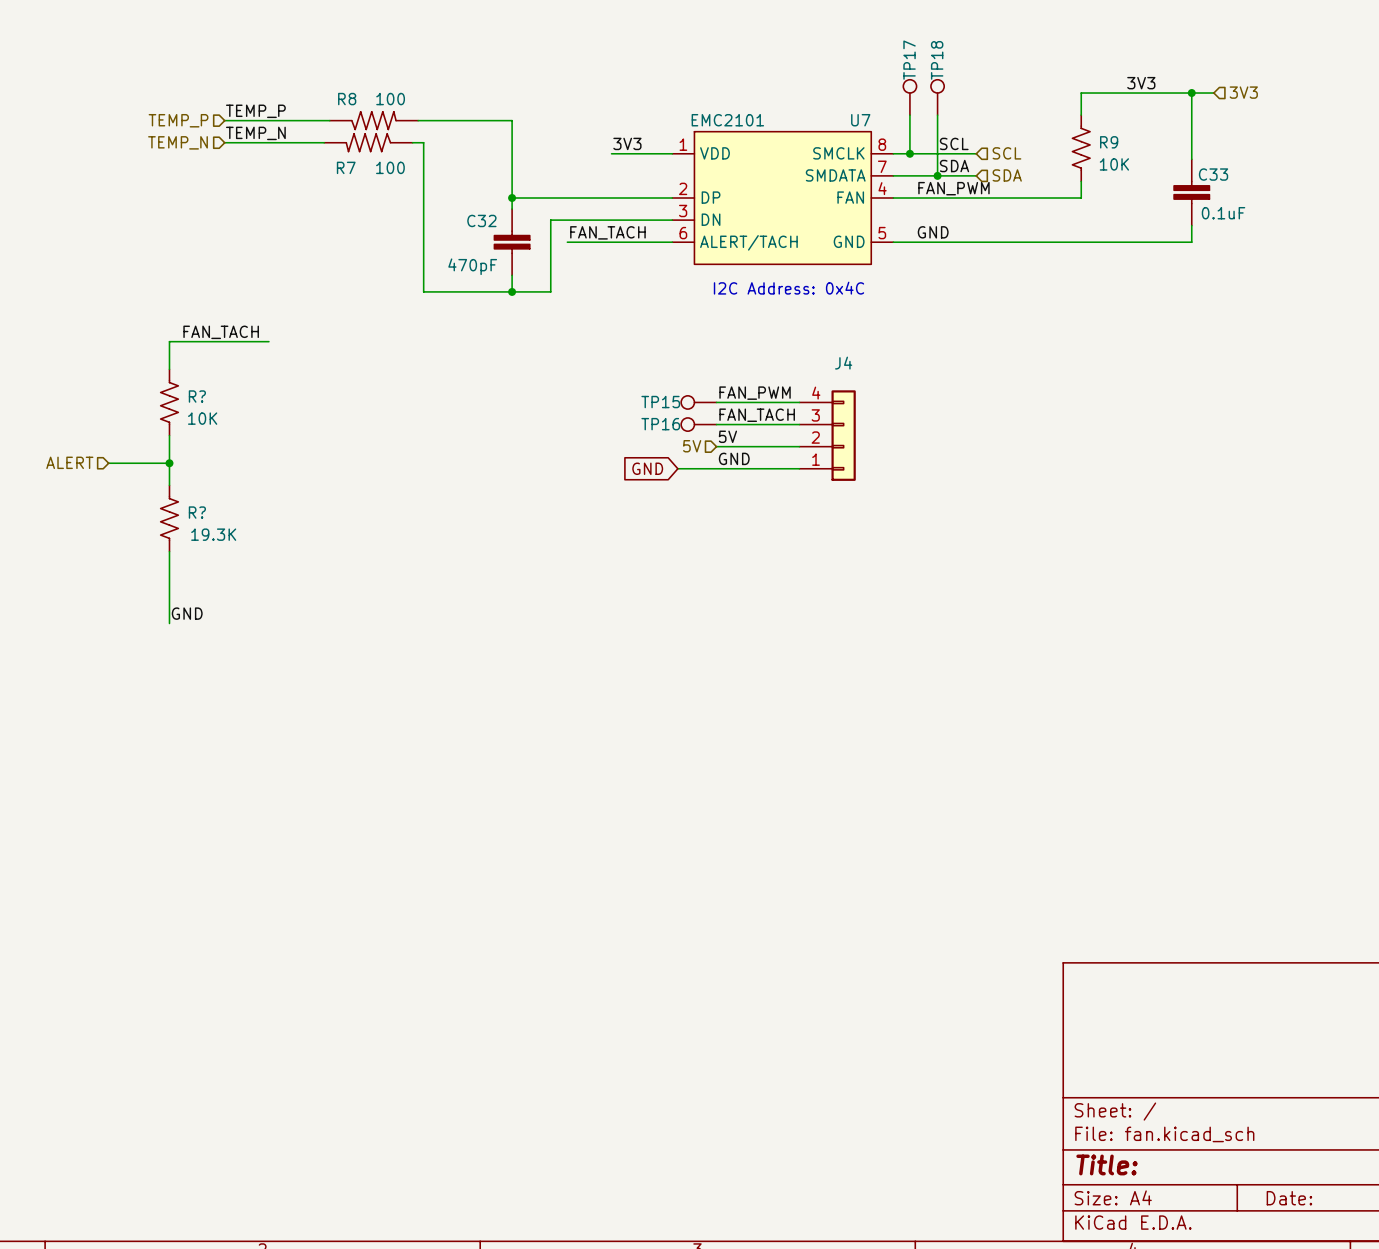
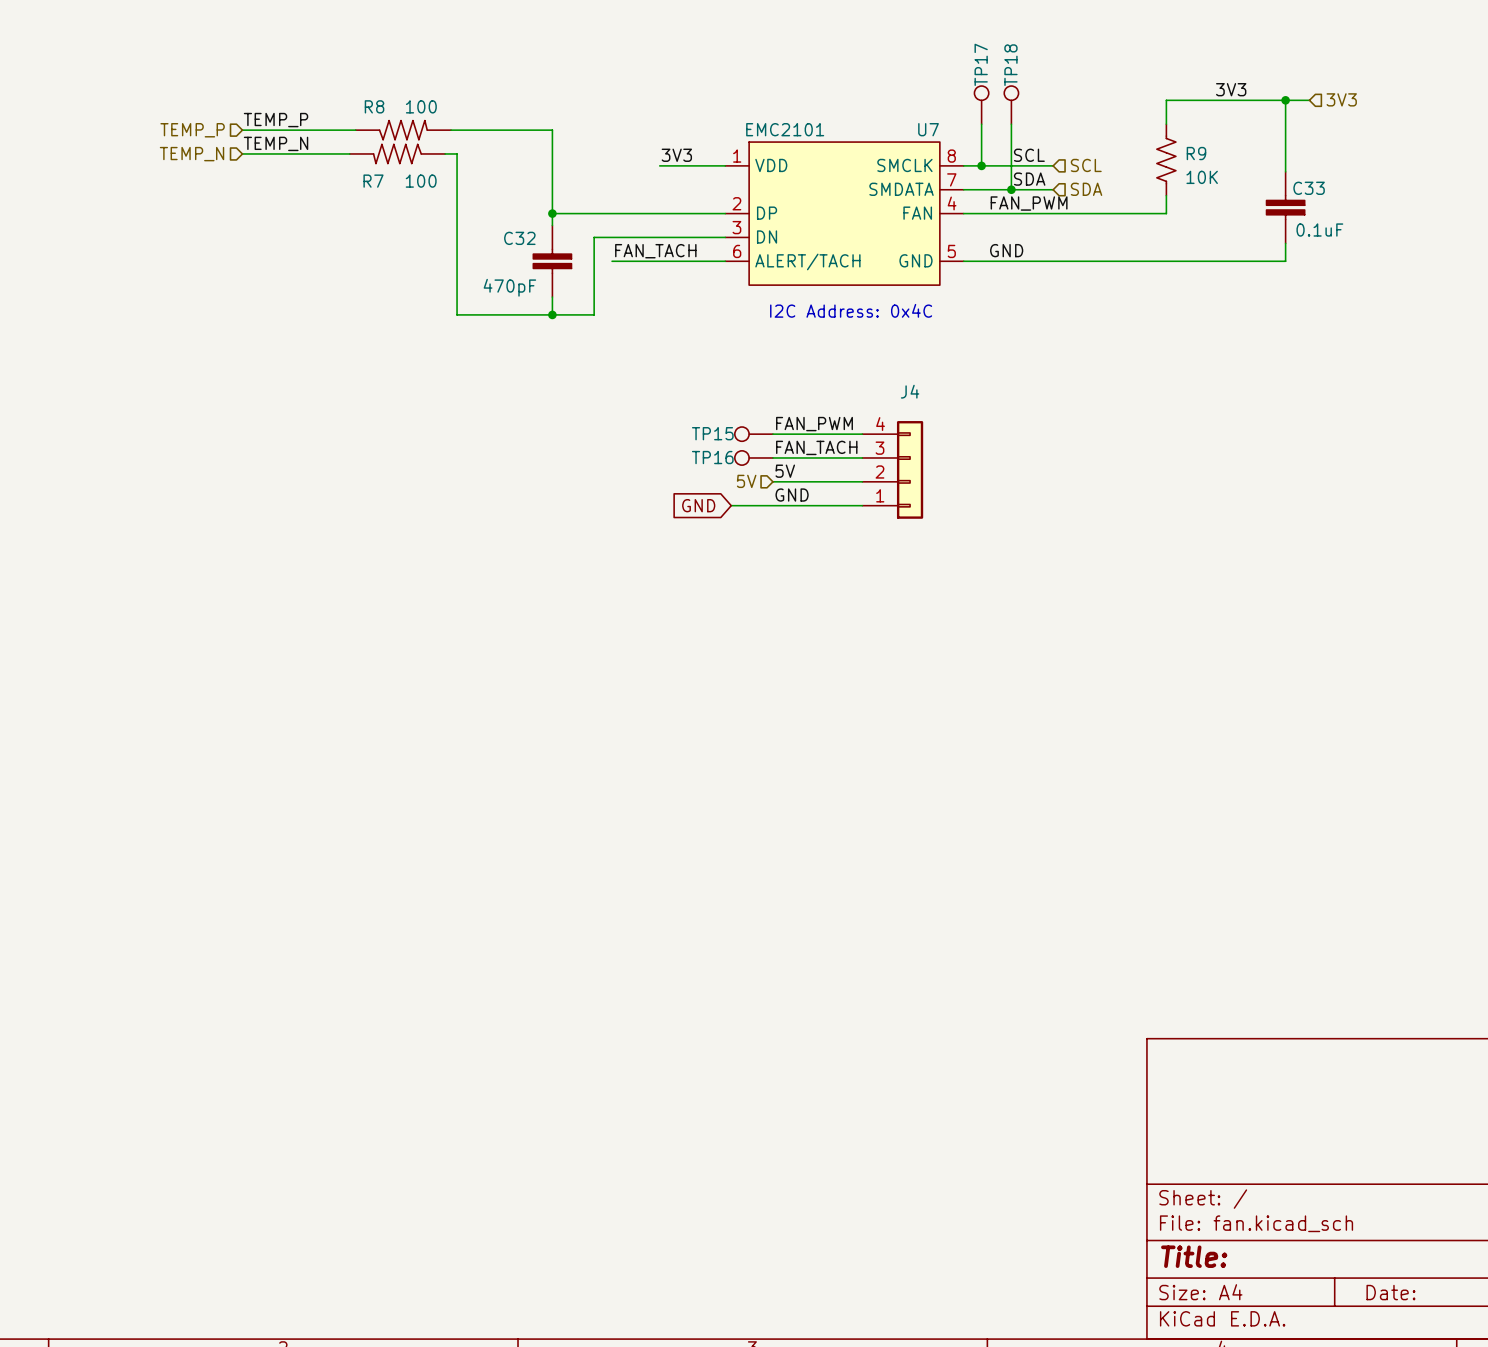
label: FAN_TACH (221, 332) -> none
wire: (268, 341) (169, 341) (169, 369) -> none
R?: 10K (169, 402) -> none
wire: (169, 435) (169, 485) -> none
hierarchical label: ALERT (69, 462) -> none
wire: (108, 463) (169, 463) -> none
junction: (169, 463) -> none
R?: 19.3K (169, 518) -> none
wire: (169, 551) (169, 623) -> none
label: GND (187, 613) -> none

